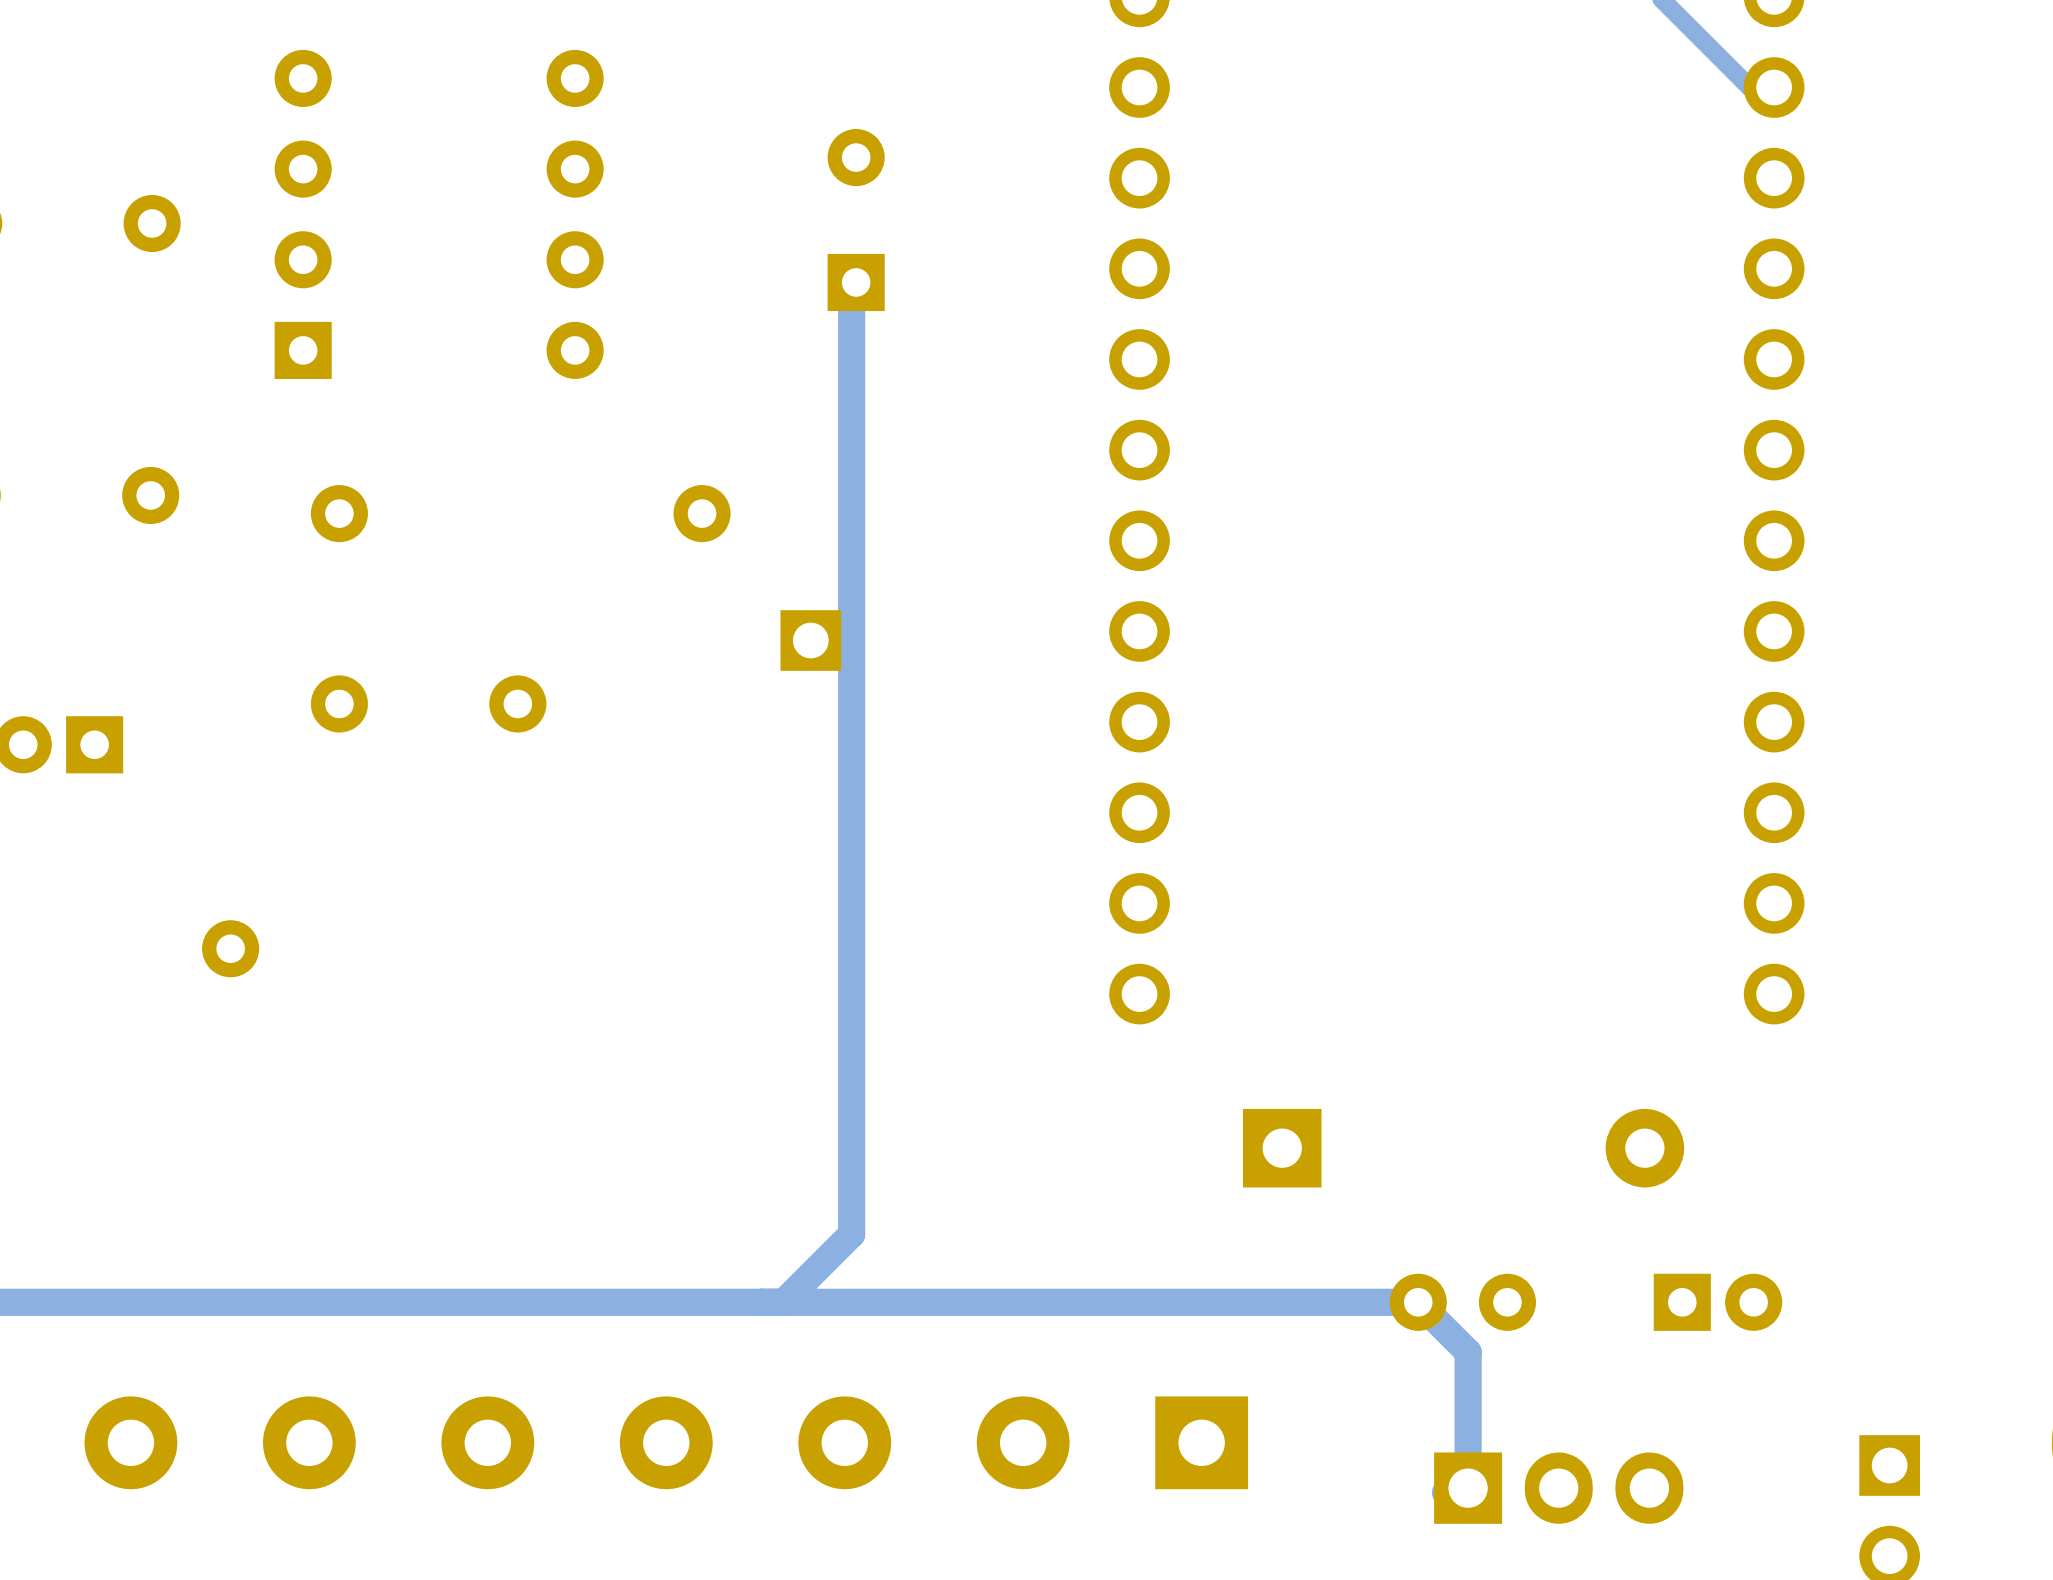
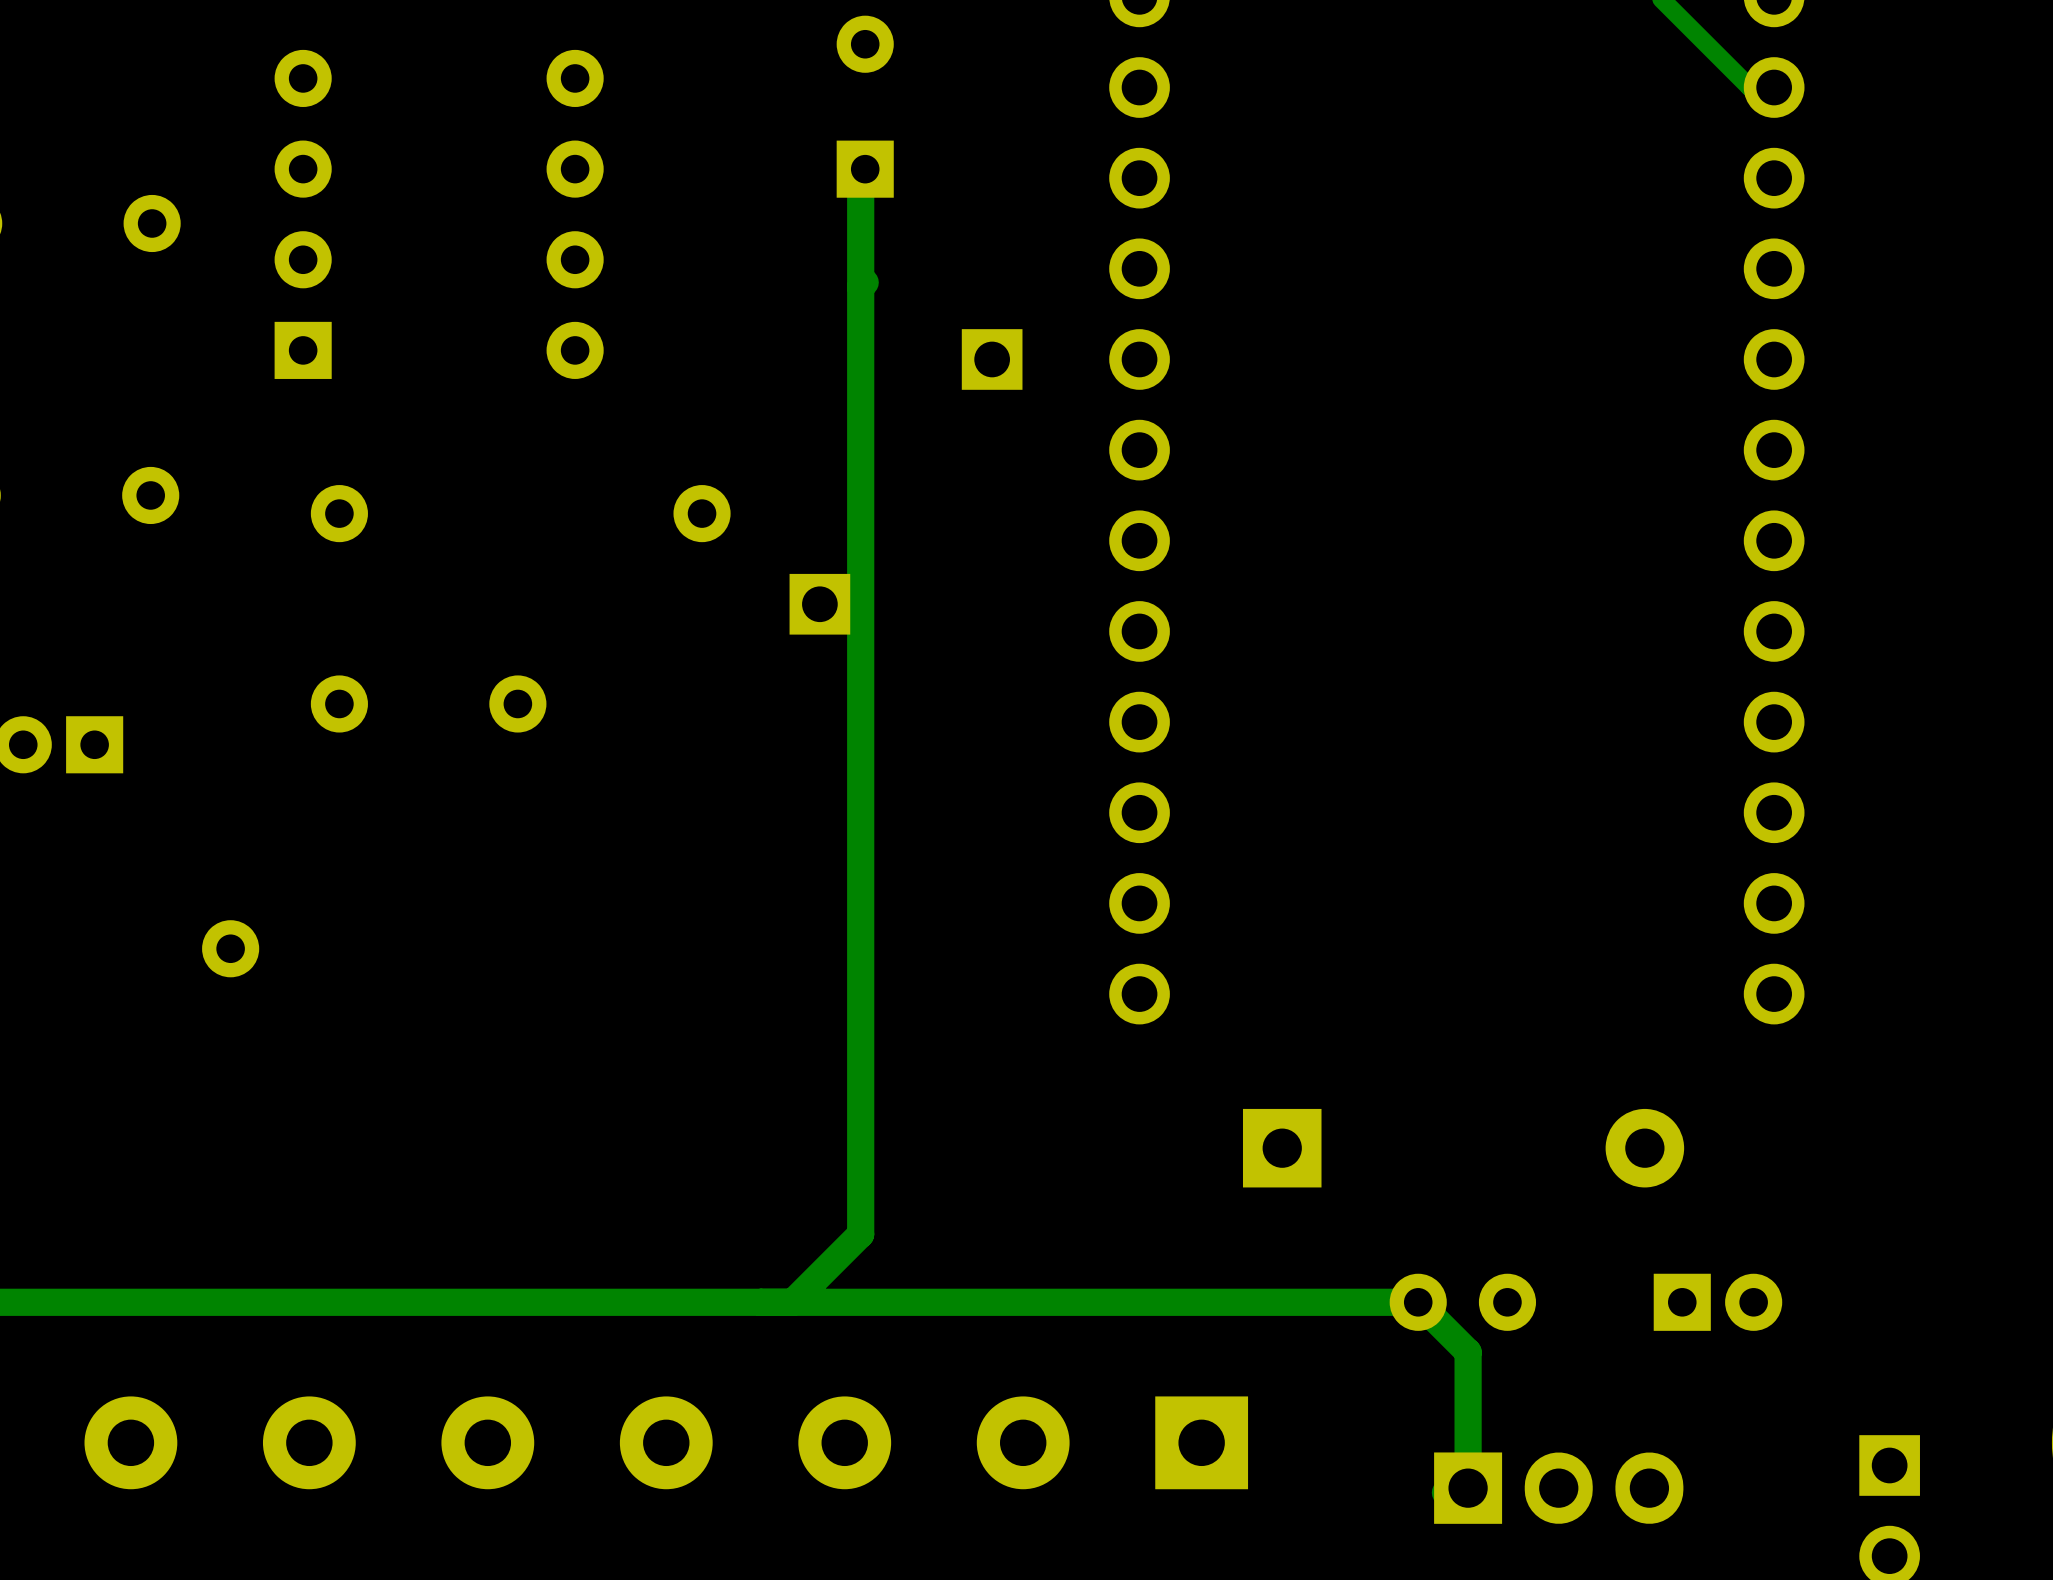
track: none -> (860, 169) (860, 1234) (792, 1302)
part position: (856, 220) -> (865, 106)
track: (851, 287) (851, 1234) (783, 1302) -> none
part: none -> (992, 359)
part position: (810, 640) -> (819, 604)

